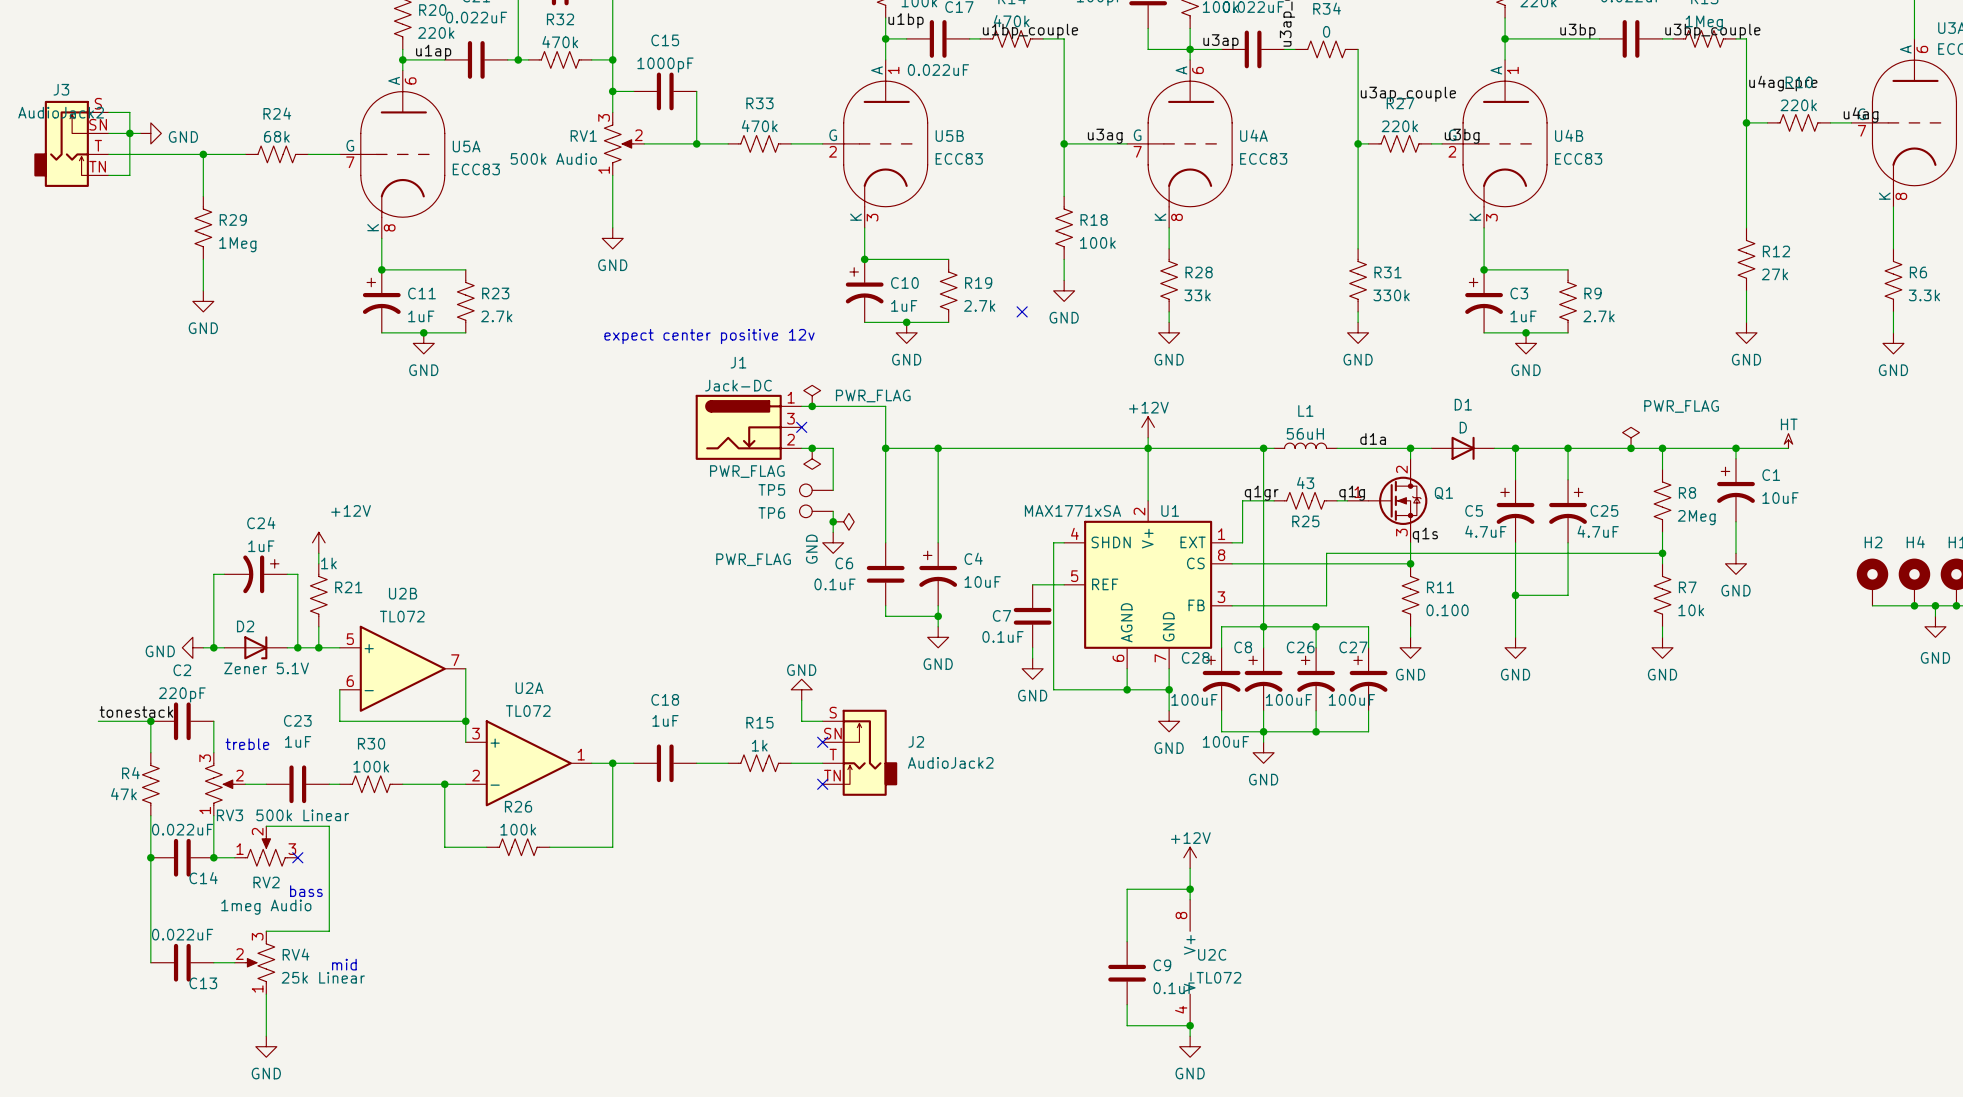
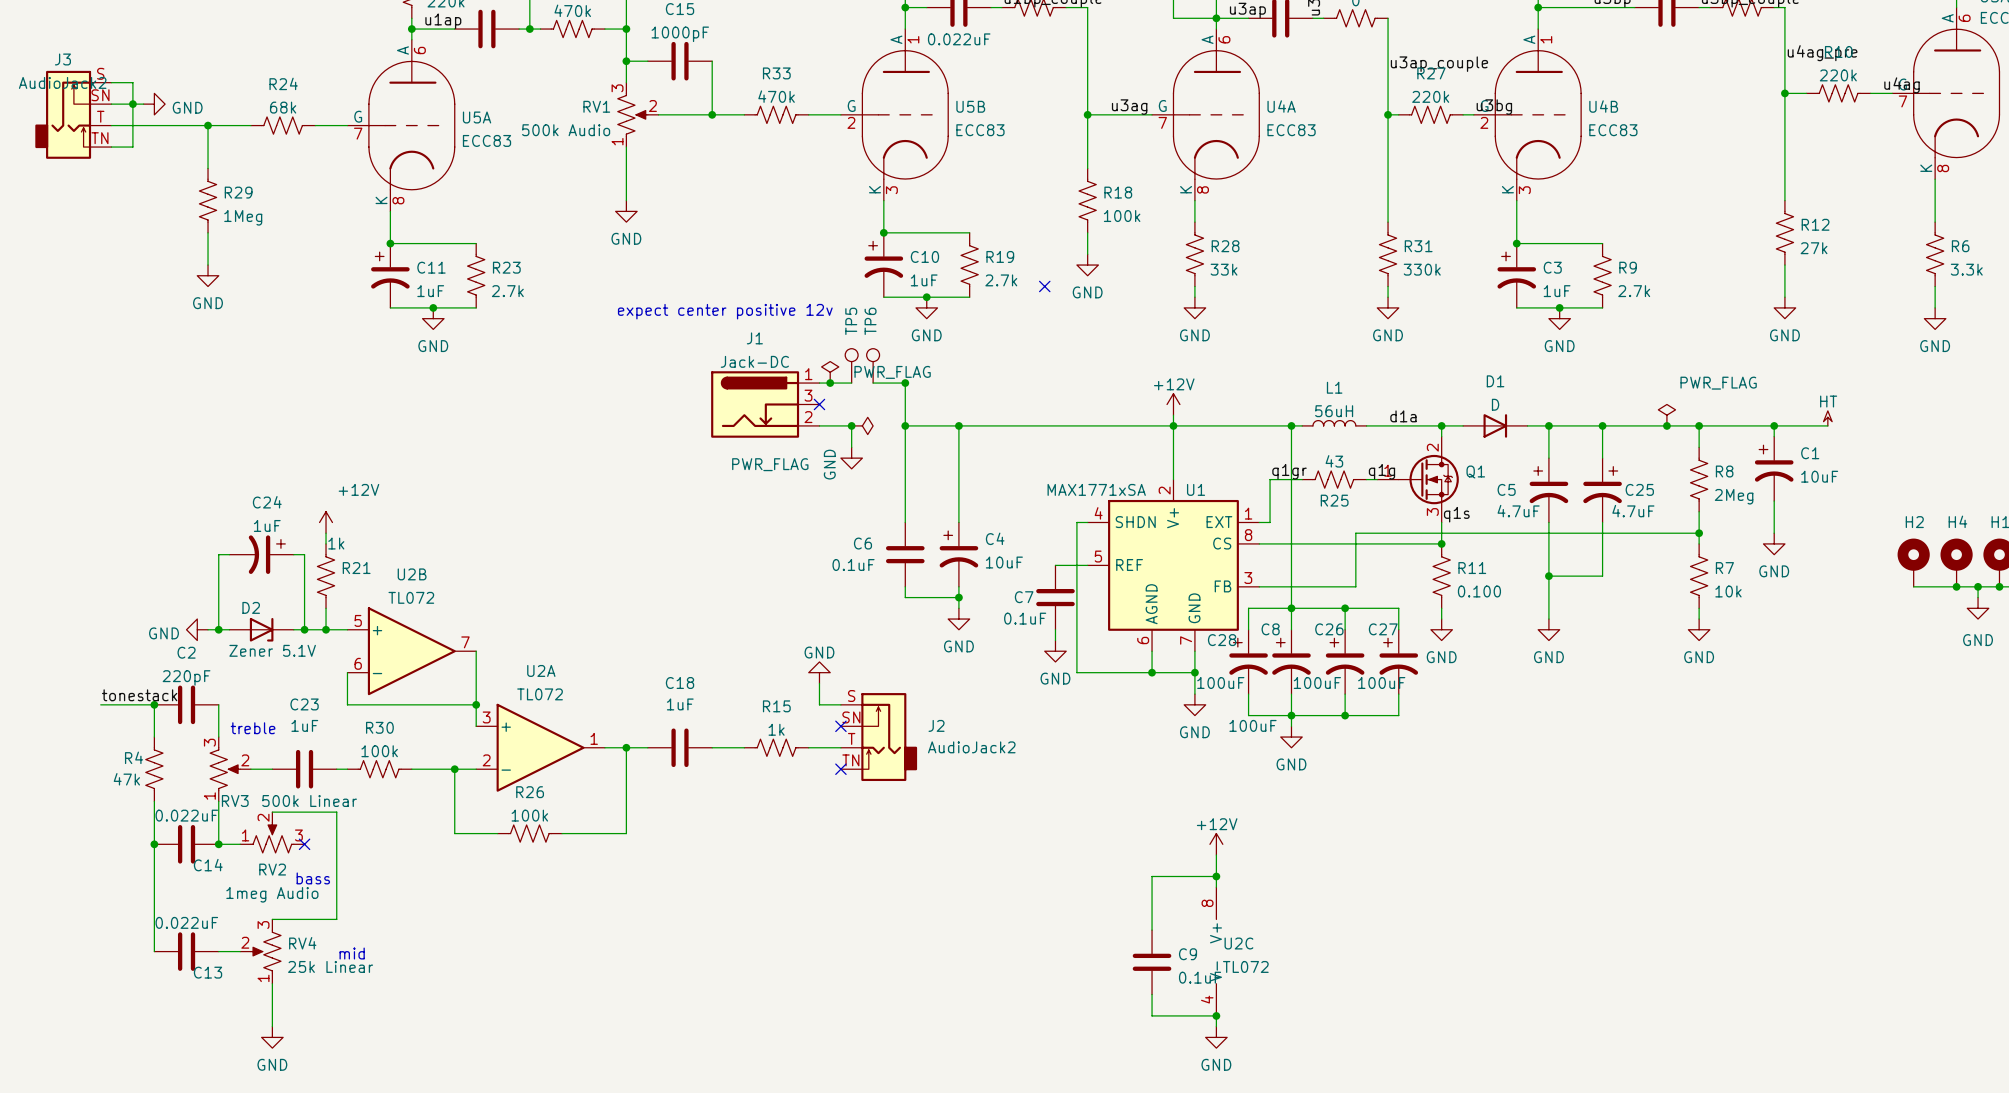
wire: (833, 406) (854, 406) -> none
junction: none -> (905, 383)
junction position: (812, 448) -> (851, 425)
power symbol rotation: 0° (812, 458) -> 90° counterclockwise (862, 425)
power symbol position: PWR_FLAG (812, 458) -> PWR_FLAG (862, 425)
power symbol text position: PWR_FLAG (747, 471) -> PWR_FLAG (770, 464)
TP5 rotation: 0° (805, 490) -> 90° clockwise (851, 355)
TP5 position: (816, 490) -> (851, 365)
TP6 rotation: 0° (805, 511) -> 90° clockwise (873, 355)
TP6 position: (816, 511) -> (873, 365)
wire: (833, 511) (833, 532) -> none
junction: (833, 521) -> none
power symbol: PWR_FLAG (843, 521) -> none
power symbol position: GND (833, 542) -> GND (851, 458)

